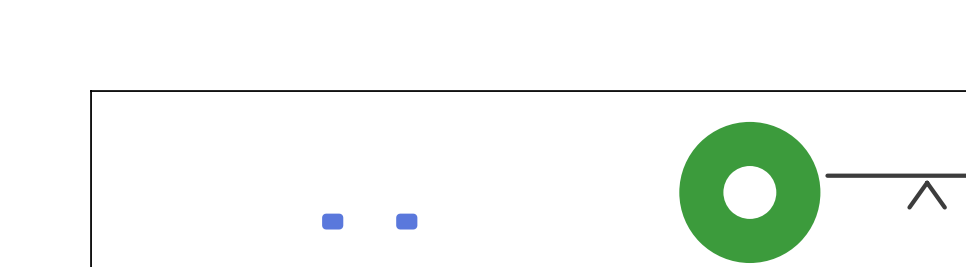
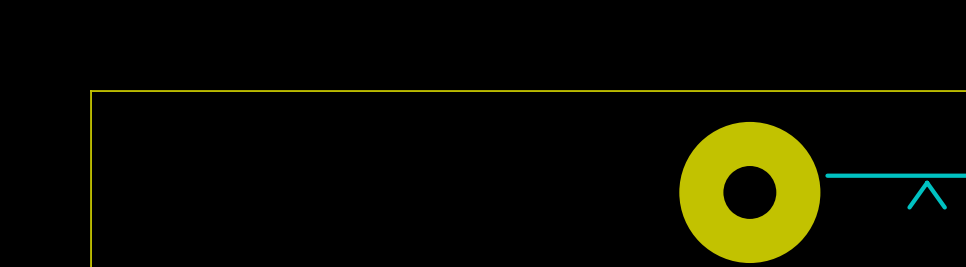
part: (369, 221) -> none

